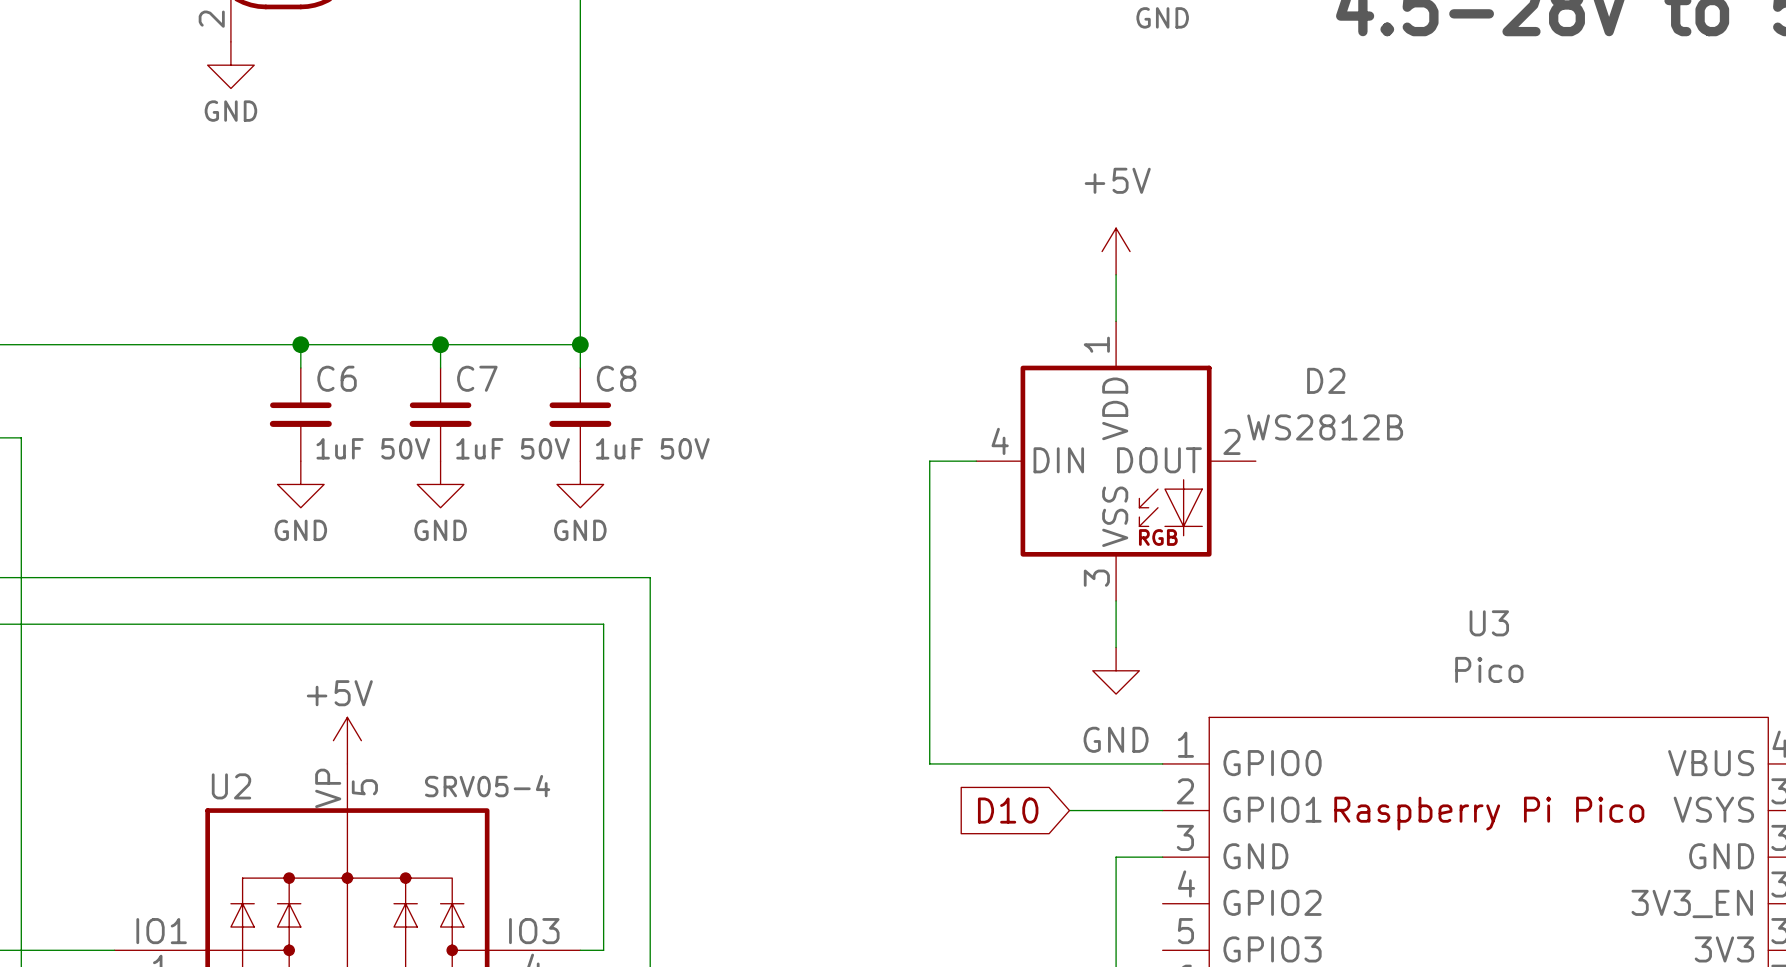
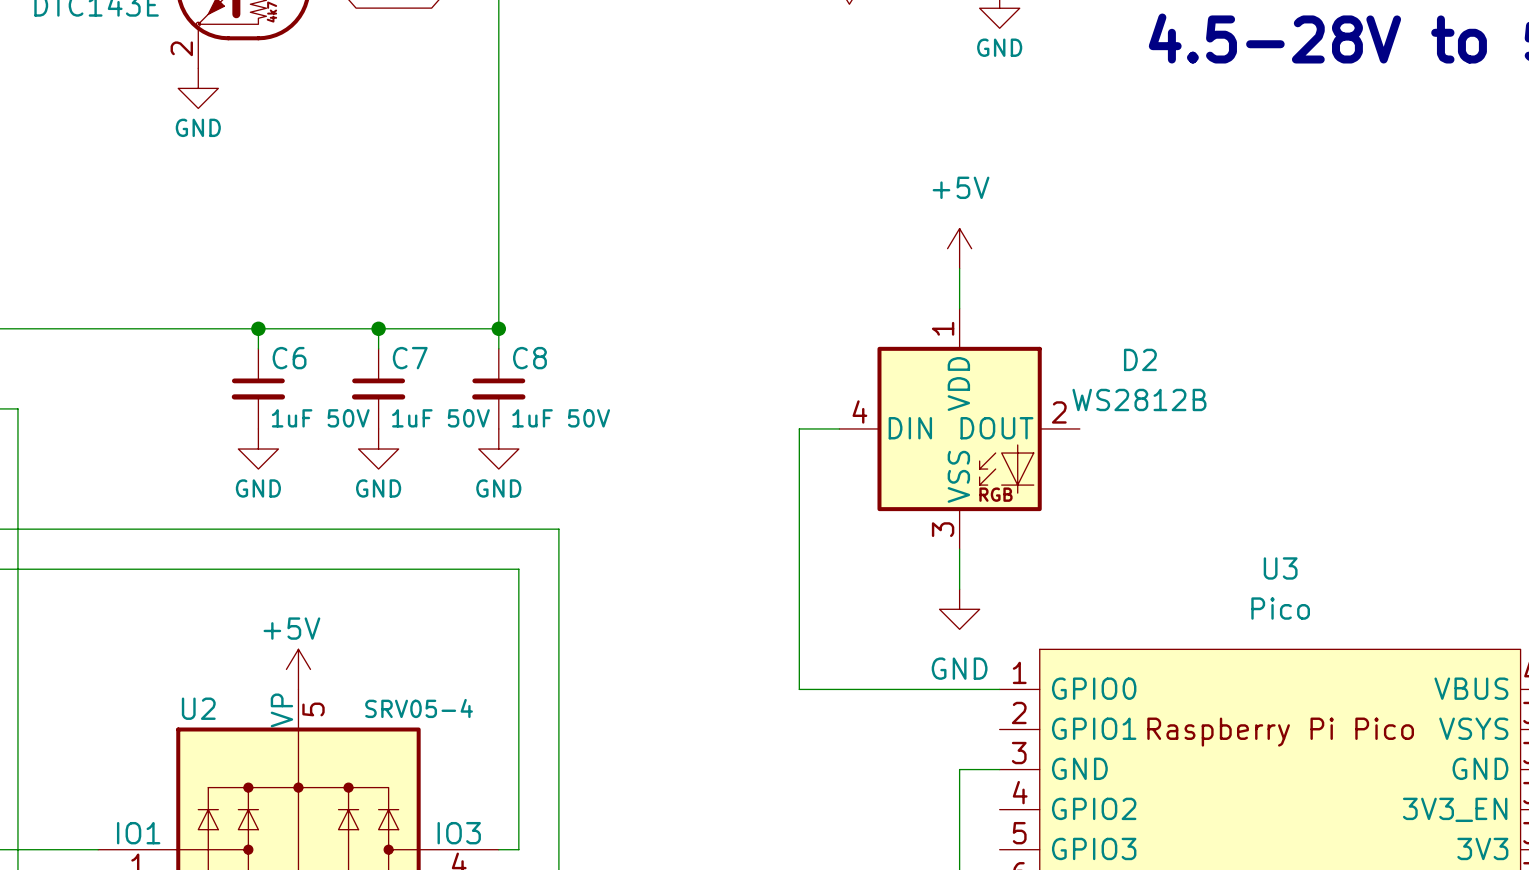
global label: D10 (1008, 810) -> none
wire: (1069, 810) (1162, 810) -> none

